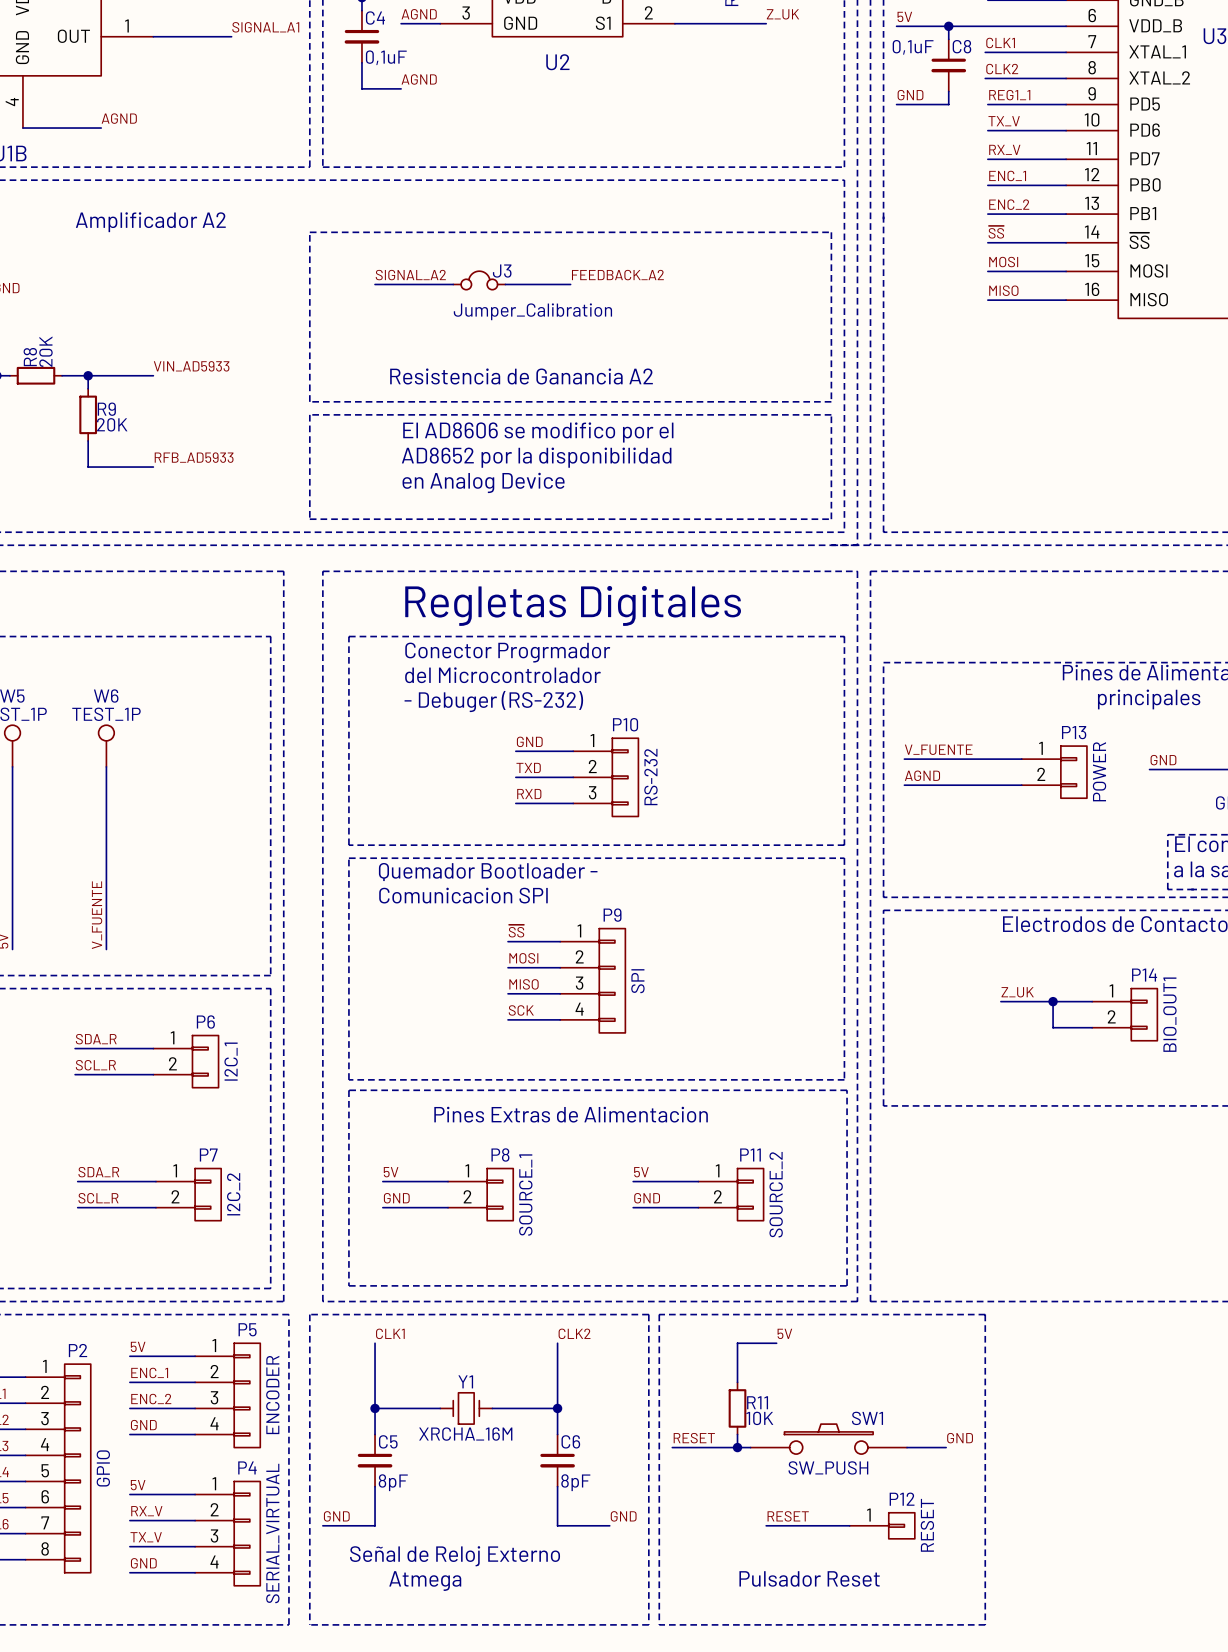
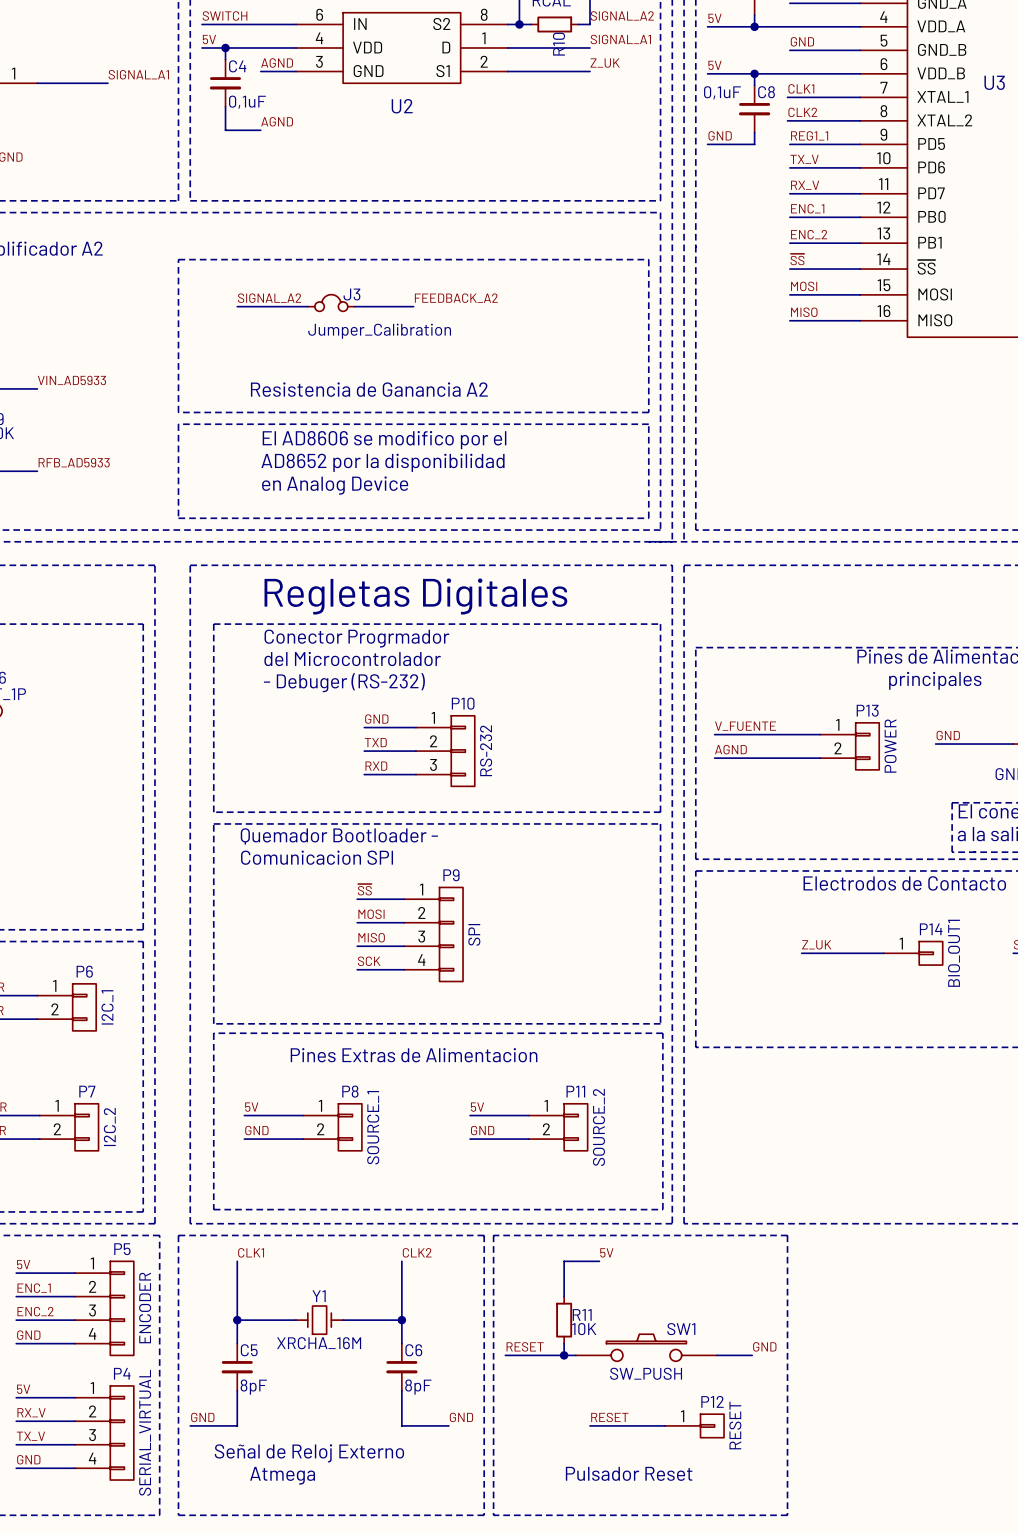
P14 symbol: [1092, 988, 1158, 1041] -> [883, 941, 943, 966]
wire: (1053, 1001) (1053, 1027) (1092, 1027) -> none
junction: (1053, 1001) -> none

